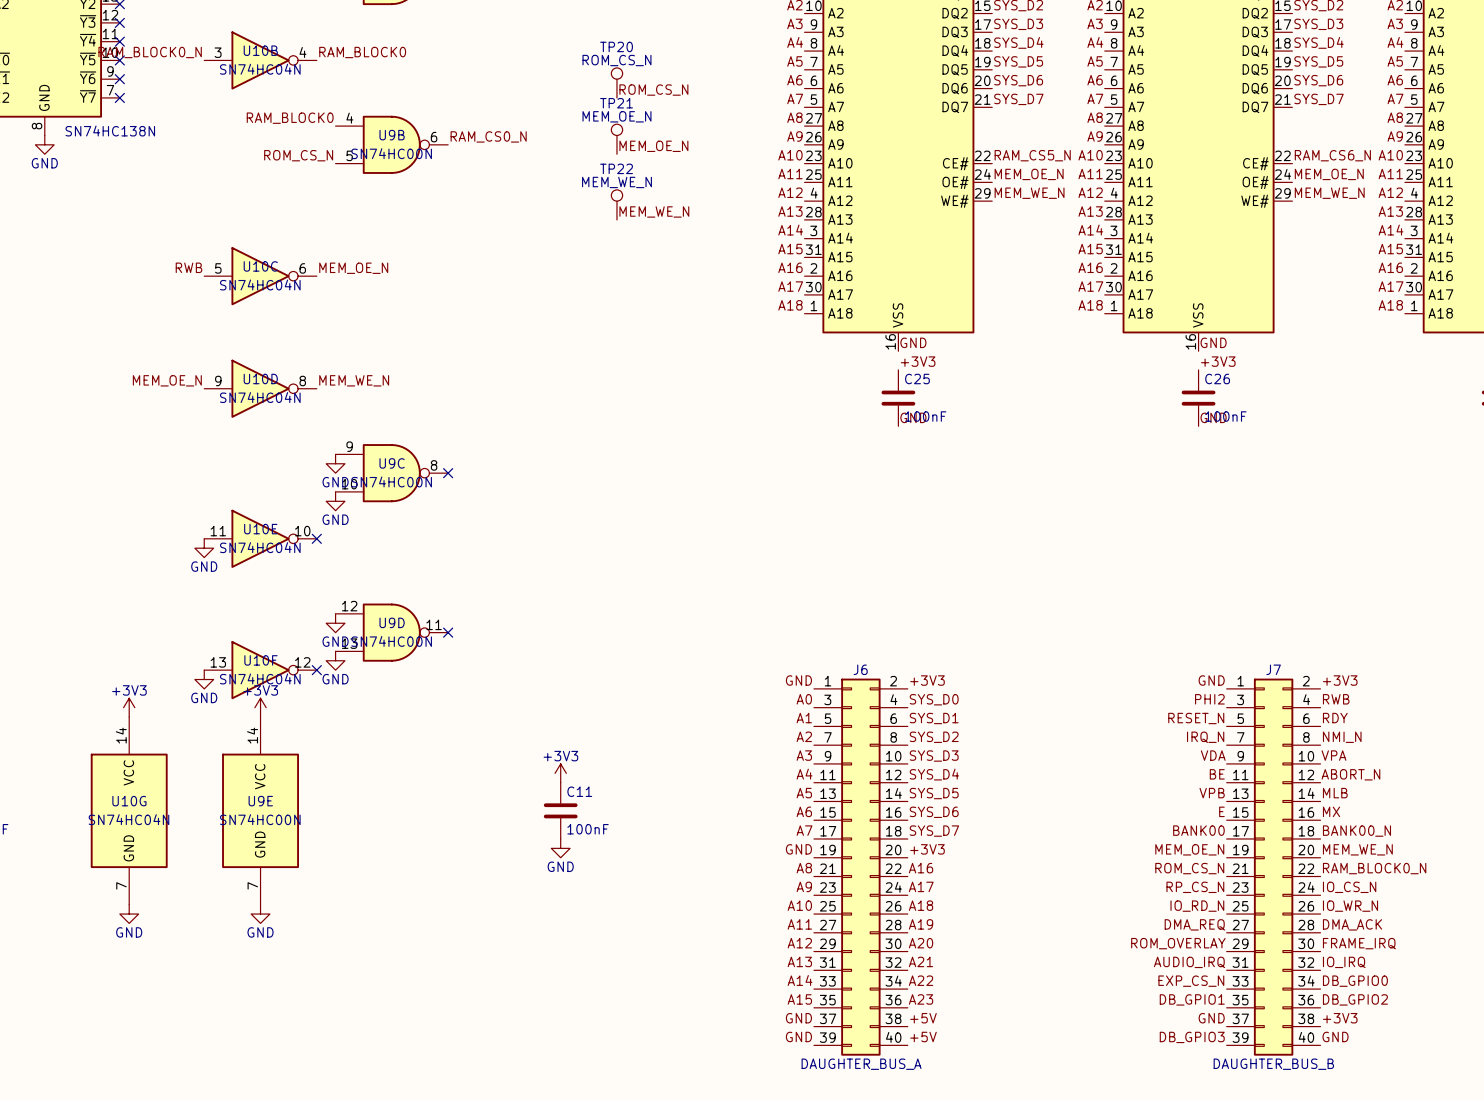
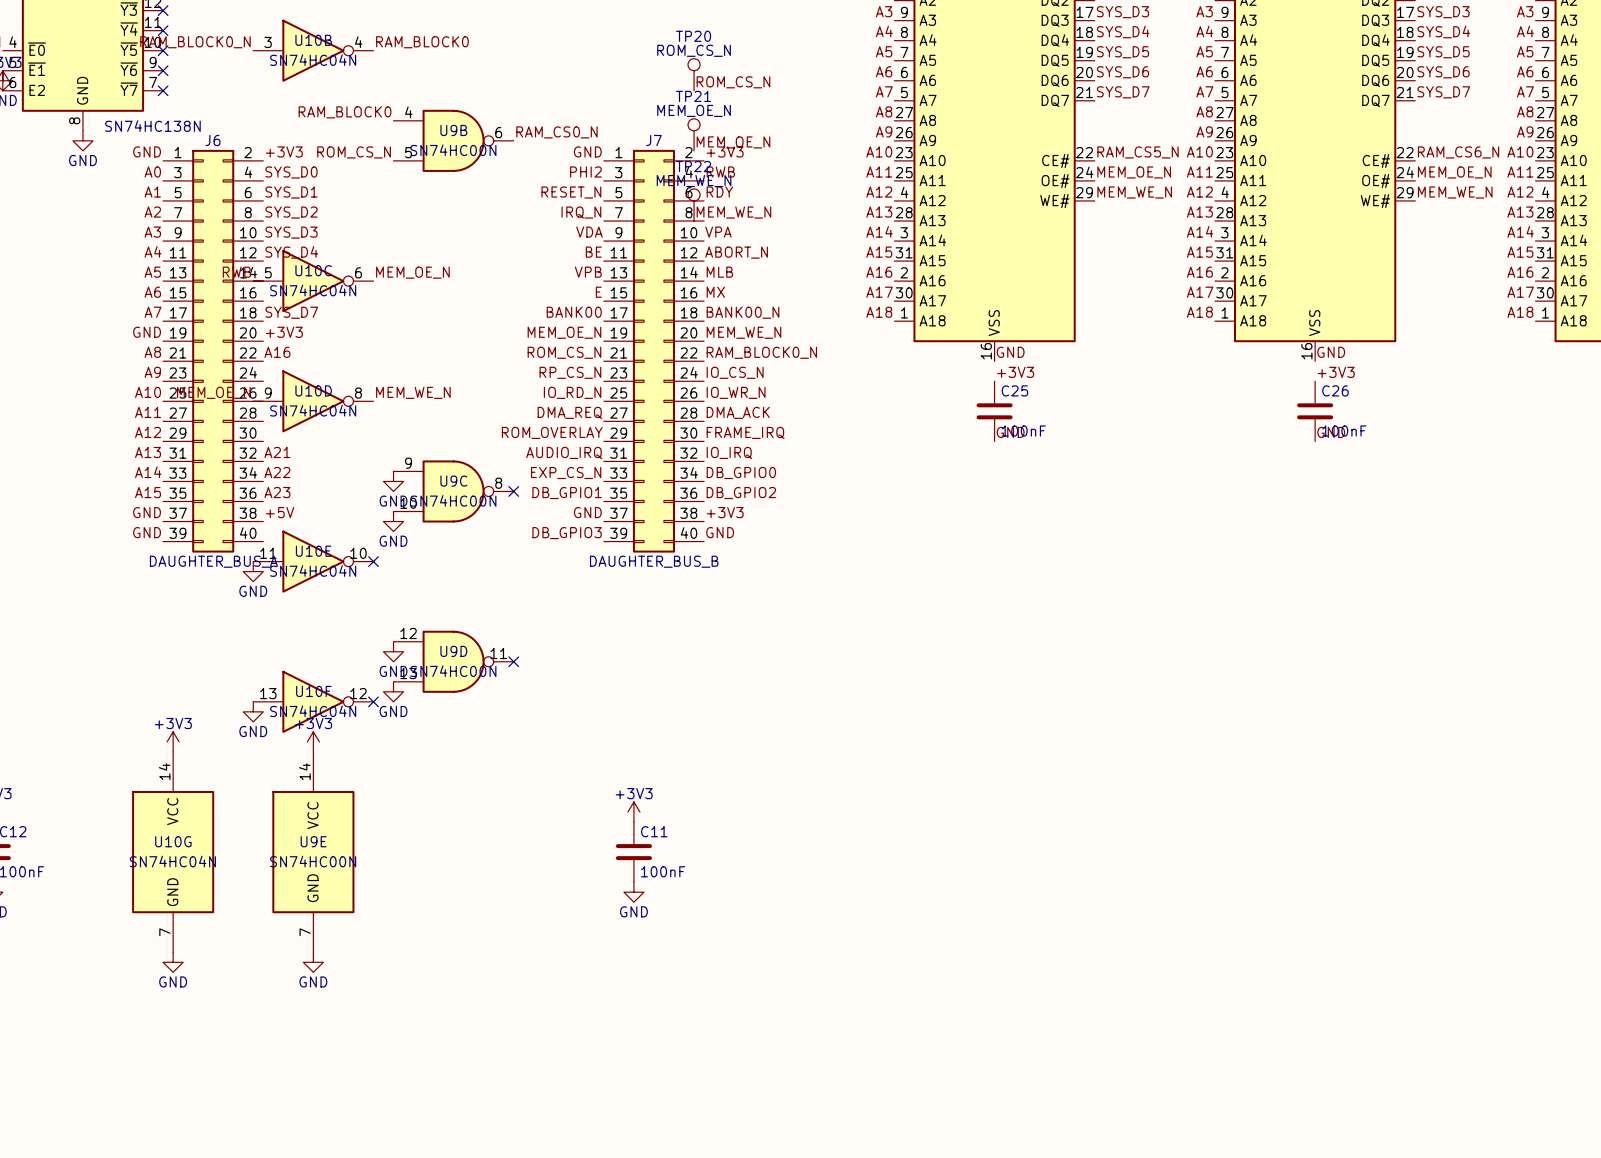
label: none -> GND (147, 151)
label: none -> +3V3 (284, 151)
label: none -> GND (587, 151)
label: none -> +3V3 (725, 151)
label: none -> A0 (152, 171)
label: none -> SYS_D0 (291, 172)
label: none -> PHI2 (585, 171)
label: none -> RWB (720, 171)
label: none -> A1 (152, 192)
label: none -> RDY (719, 192)
label: none -> SYS_D1 (291, 192)
label: none -> RESET_N (571, 192)
label: none -> A2 (152, 212)
label: none -> SYS_D2 (291, 212)
label: none -> IRQ_N (581, 212)
label: none -> A3 (152, 232)
label: none -> SYS_D3 (291, 232)
label: none -> VDA (589, 232)
label: none -> VPA (718, 232)
label: none -> A4 (153, 251)
label: none -> SYS_D4 (291, 252)
label: none -> BE (593, 252)
label: none -> ABORT_N (736, 252)
label: none -> A5 (152, 272)
label: none -> VPB (588, 272)
label: none -> MLB (719, 272)
label: none -> A6 (152, 292)
label: none -> E (598, 292)
label: none -> MX (715, 292)
label: none -> A7 (153, 312)
label: none -> SYS_D7 (291, 312)
label: none -> BANK00 (574, 312)
label: none -> BANK00_N (743, 312)
label: none -> GND (147, 332)
label: none -> +3V3 (284, 332)
label: none -> MEM_OE_N (564, 332)
label: none -> MEM_WE_N (743, 332)
label: none -> A8 (152, 352)
label: none -> A16 (277, 352)
label: none -> ROM_CS_N (564, 352)
label: none -> RAM_BLOCK0_N (761, 352)
label: none -> A9 (152, 372)
label: none -> RP_CS_N (570, 372)
label: none -> IO_CS_N (735, 372)
label: none -> A10 (148, 392)
label: none -> IO_RD_N (572, 392)
label: none -> IO_WR_N (736, 392)
label: none -> A11 (148, 412)
label: none -> DMA_REQ (569, 412)
label: none -> DMA_ACK (738, 412)
label: none -> A12 (148, 432)
label: none -> ROM_OVERLAY (552, 432)
label: none -> FRAME_IRQ (745, 432)
label: none -> A13 (148, 452)
label: none -> A21 (277, 452)
label: none -> AUDIO_IRQ (564, 452)
label: none -> IO_IRQ (729, 452)
label: none -> A14 (148, 472)
label: none -> A22 (277, 472)
label: none -> EXP_CS_N (566, 473)
label: none -> DB_GPIO0 (741, 473)
label: none -> A15 (148, 492)
label: none -> A23 (277, 492)
label: none -> DB_GPIO1 (567, 493)
label: none -> DB_GPIO2 (741, 493)
label: none -> GND (147, 512)
label: none -> +5V (280, 512)
label: none -> GND (587, 512)
label: none -> +3V3 (725, 512)
label: none -> GND (147, 532)
label: none -> GND (720, 532)
label: none -> DB_GPIO3 (567, 533)
label: GND (798, 680) -> none
label: +3V3 (927, 680) -> none
label: GND (1211, 680) -> none
label: +3V3 (1340, 680) -> none
label: A0 (804, 699) -> none
label: SYS_D0 (934, 699) -> none
label: PHI2 (1209, 699) -> none
label: RWB (1336, 699) -> none
label: A1 (804, 718) -> none
label: SYS_D1 (934, 718) -> none
label: RESET_N (1196, 718) -> none
label: RDY (1335, 718) -> none
label: A2 (804, 736) -> none
label: SYS_D2 (934, 737) -> none
label: IRQ_N (1205, 737) -> none
label: NMI_N (1342, 737) -> none
label: A3 (804, 755) -> none
label: VDA (1213, 755) -> none
label: VPA (1333, 755) -> none
label: SYS_D3 (934, 756) -> none
label: A4 (804, 774) -> none
label: SYS_D4 (934, 774) -> none
label: BE (1217, 774) -> none
label: ABORT_N (1350, 774) -> none
label: A5 (804, 793) -> none
label: SYS_D5 (934, 793) -> none
label: VPB (1212, 793) -> none
label: MLB (1335, 793) -> none
label: A6 (804, 811) -> none
label: E (1221, 811) -> none
label: MX (1331, 811) -> none
label: SYS_D6 (934, 812) -> none
label: A7 (804, 830) -> none
label: BANK00 (1198, 830) -> none
label: SYS_D7 (934, 831) -> none
label: BANK00_N (1356, 831) -> none
label: GND (798, 849) -> none
label: +3V3 (927, 849) -> none
label: MEM_OE_N (1189, 849) -> none
label: MEM_WE_N (1357, 849) -> none
J6 position: (860, 867) -> (213, 351)
J7 position: (1273, 867) -> (653, 351)
label: A8 (804, 868) -> none
label: A16 (921, 868) -> none
label: ROM_CS_N (1189, 868) -> none
label: RAM_BLOCK0_N (1374, 868) -> none
label: A9 (804, 886) -> none
label: A17 (921, 886) -> none
label: RP_CS_N (1195, 887) -> none
label: IO_CS_N (1349, 887) -> none
label: A10 (799, 905) -> none
label: A18 (921, 905) -> none
label: IO_RD_N (1197, 906) -> none
label: IO_WR_N (1350, 906) -> none
label: A11 (799, 924) -> none
label: A19 (921, 924) -> none
label: DMA_REQ (1194, 924) -> none
label: DMA_ACK (1352, 924) -> none
label: A12 (799, 943) -> none
label: A20 (921, 943) -> none
label: ROM_OVERLAY (1178, 943) -> none
label: FRAME_IRQ (1359, 943) -> none
label: A13 (799, 961) -> none
label: A21 (921, 961) -> none
label: AUDIO_IRQ (1189, 962) -> none
label: IO_IRQ (1344, 962) -> none
label: A14 (800, 980) -> none
label: A22 (921, 980) -> none
label: EXP_CS_N (1191, 981) -> none
label: DB_GPIO0 (1355, 981) -> none
label: A15 (799, 999) -> none
label: A23 (921, 999) -> none
label: DB_GPIO1 (1192, 999) -> none
label: DB_GPIO2 (1355, 999) -> none
label: GND (798, 1018) -> none
label: +5V (923, 1018) -> none
label: GND (1211, 1018) -> none
label: +3V3 (1340, 1018) -> none
label: GND (798, 1036) -> none
label: +5V (923, 1036) -> none
label: GND (1335, 1036) -> none
label: DB_GPIO3 (1192, 1037) -> none

